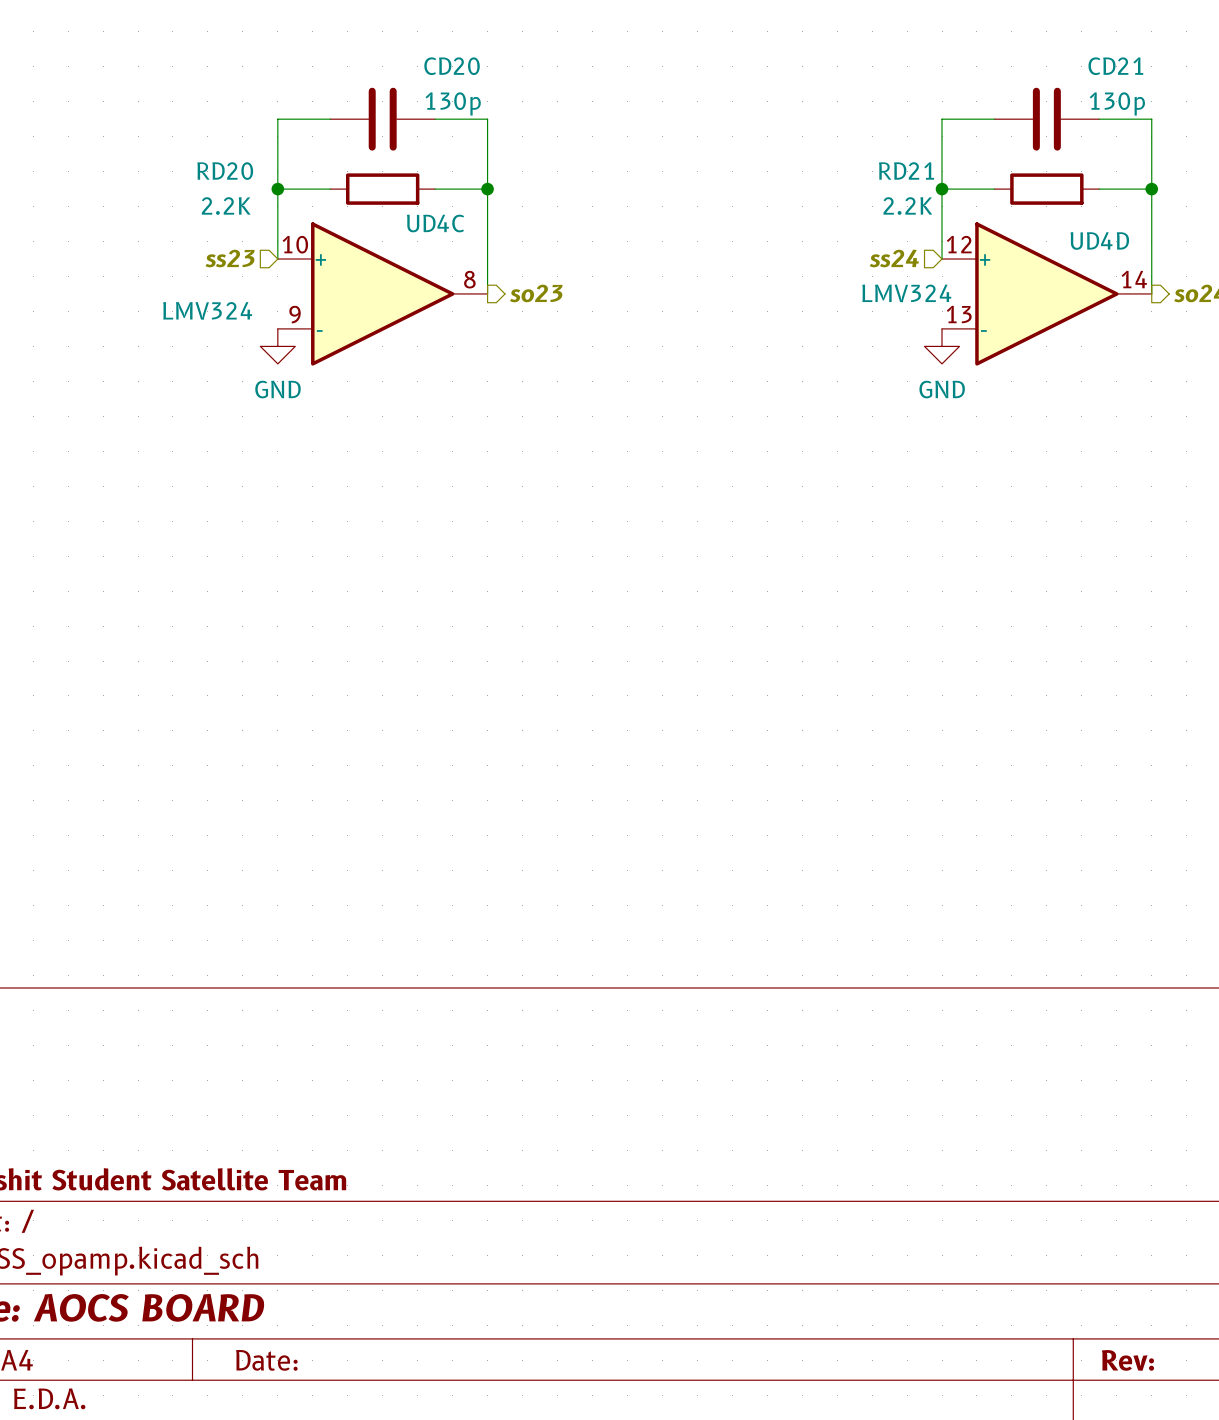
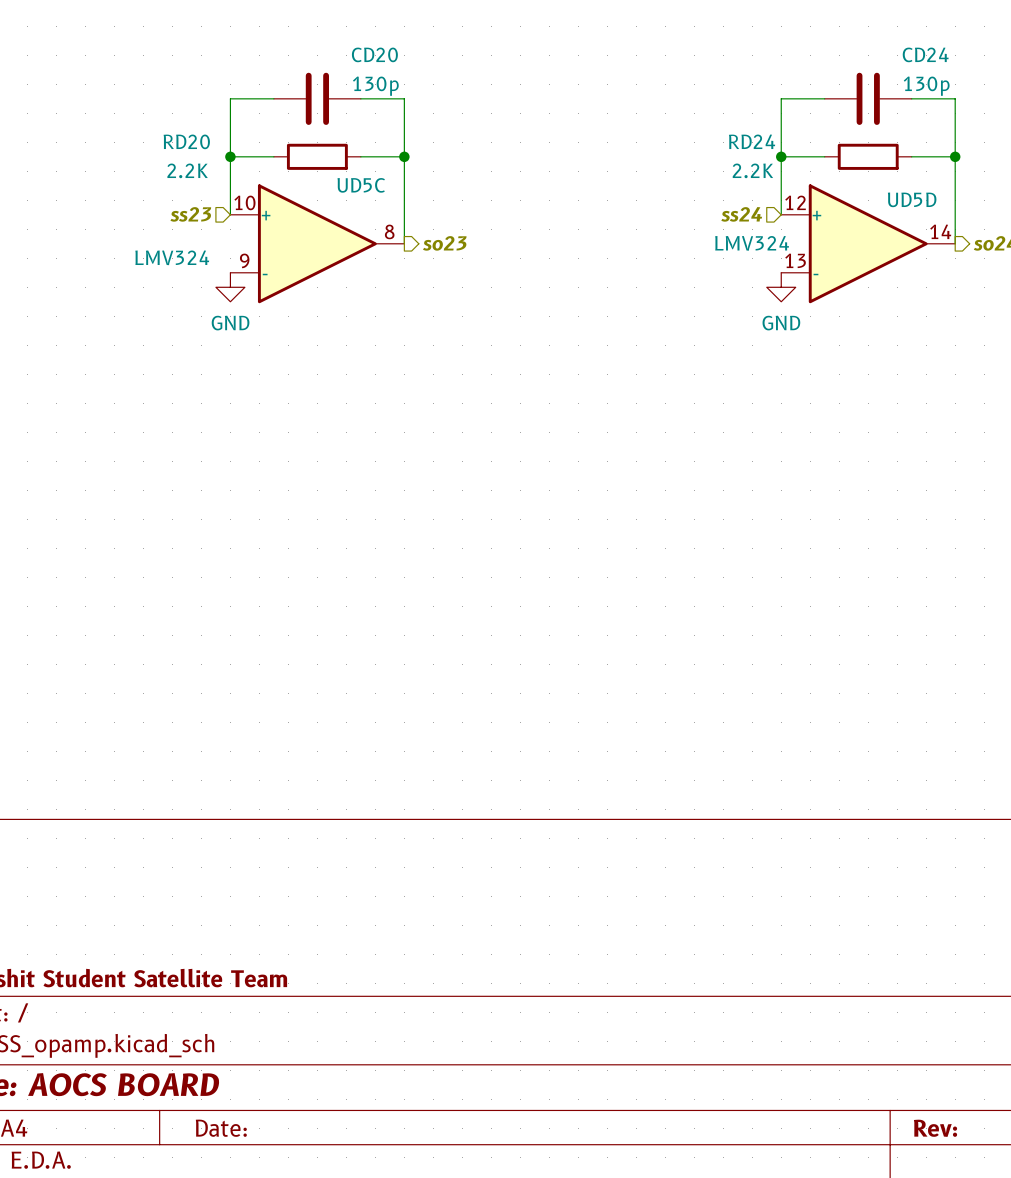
CD21 name: CD21 (1115, 66) -> CD24 (925, 54)
RD21 name: RD21 (906, 170) -> RD24 (752, 141)
UD4C name: UD4C (435, 223) -> UD5C (361, 185)
UD4D name: UD4D (1099, 240) -> UD5D (912, 199)

